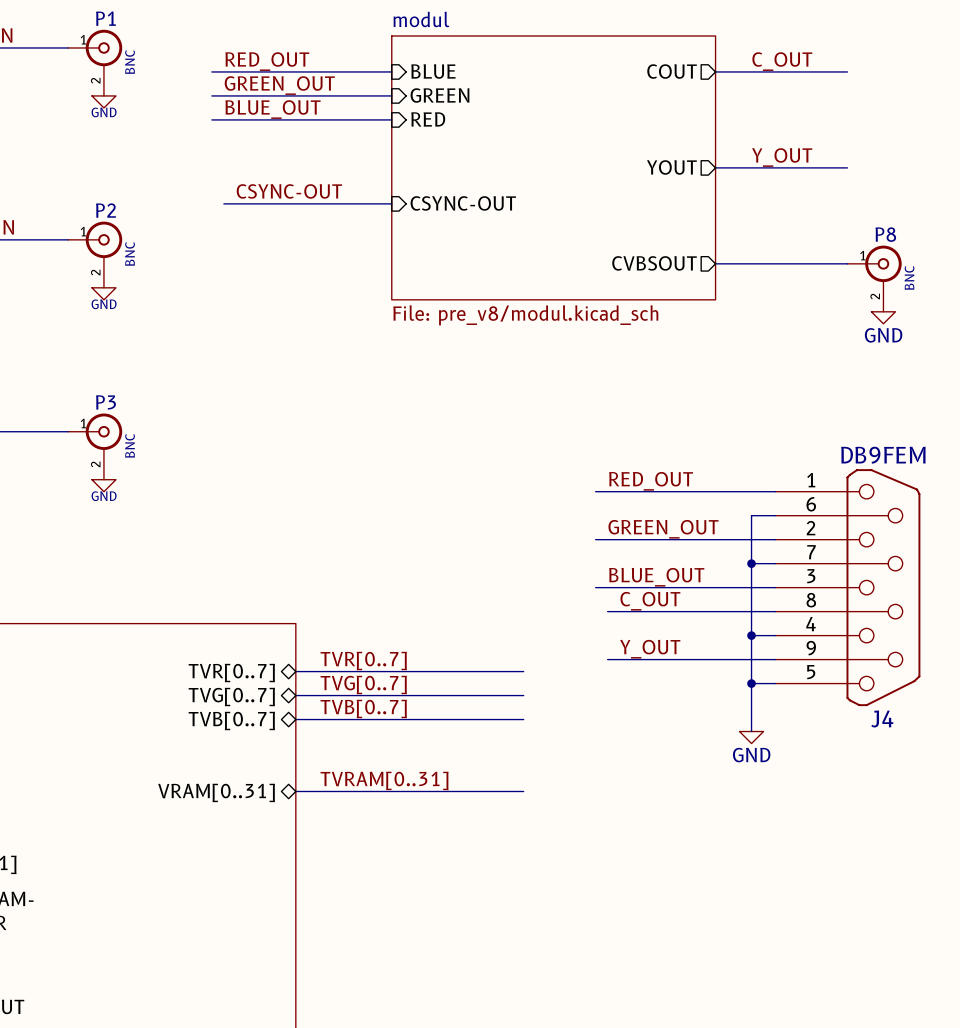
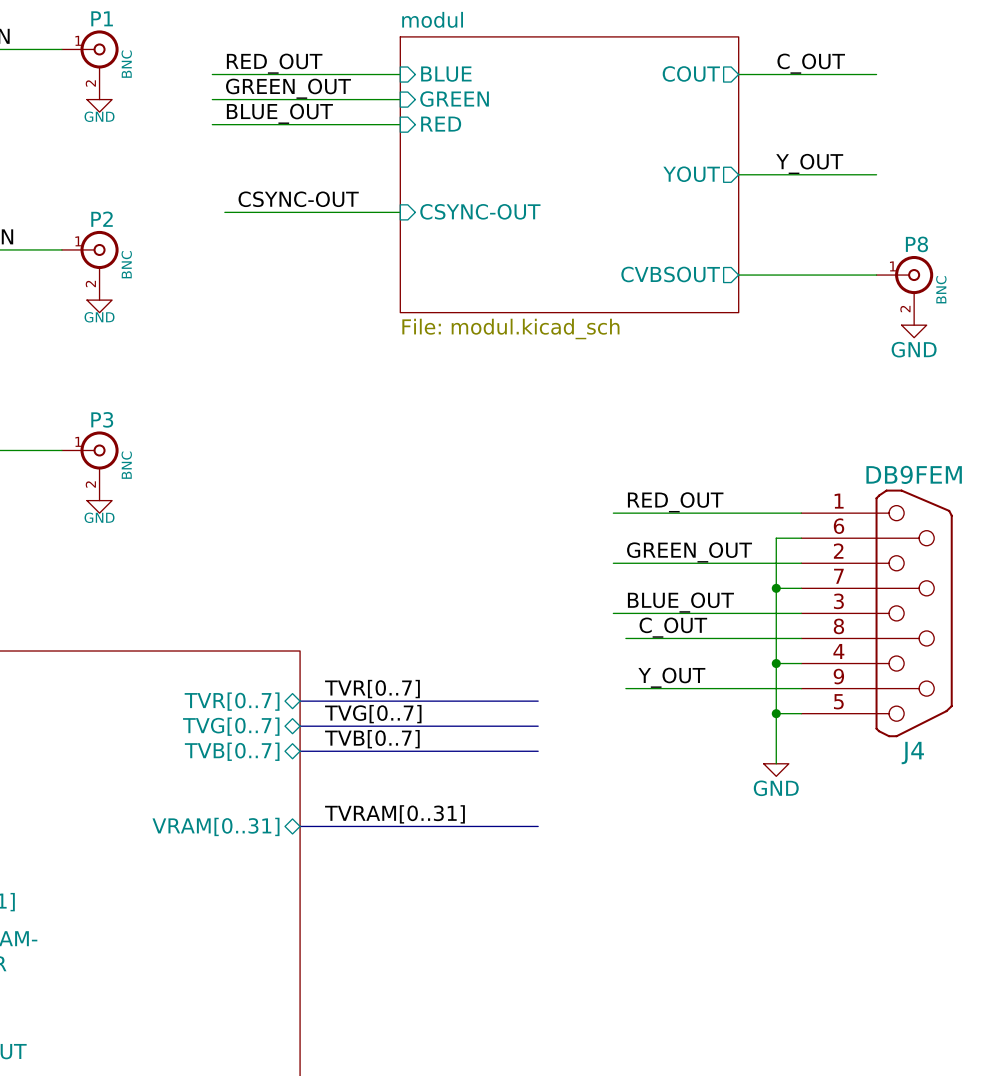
sheet modul value: File: pre_v8/modul.kicad_sch (525, 315) -> File: modul.kicad_sch (510, 329)

